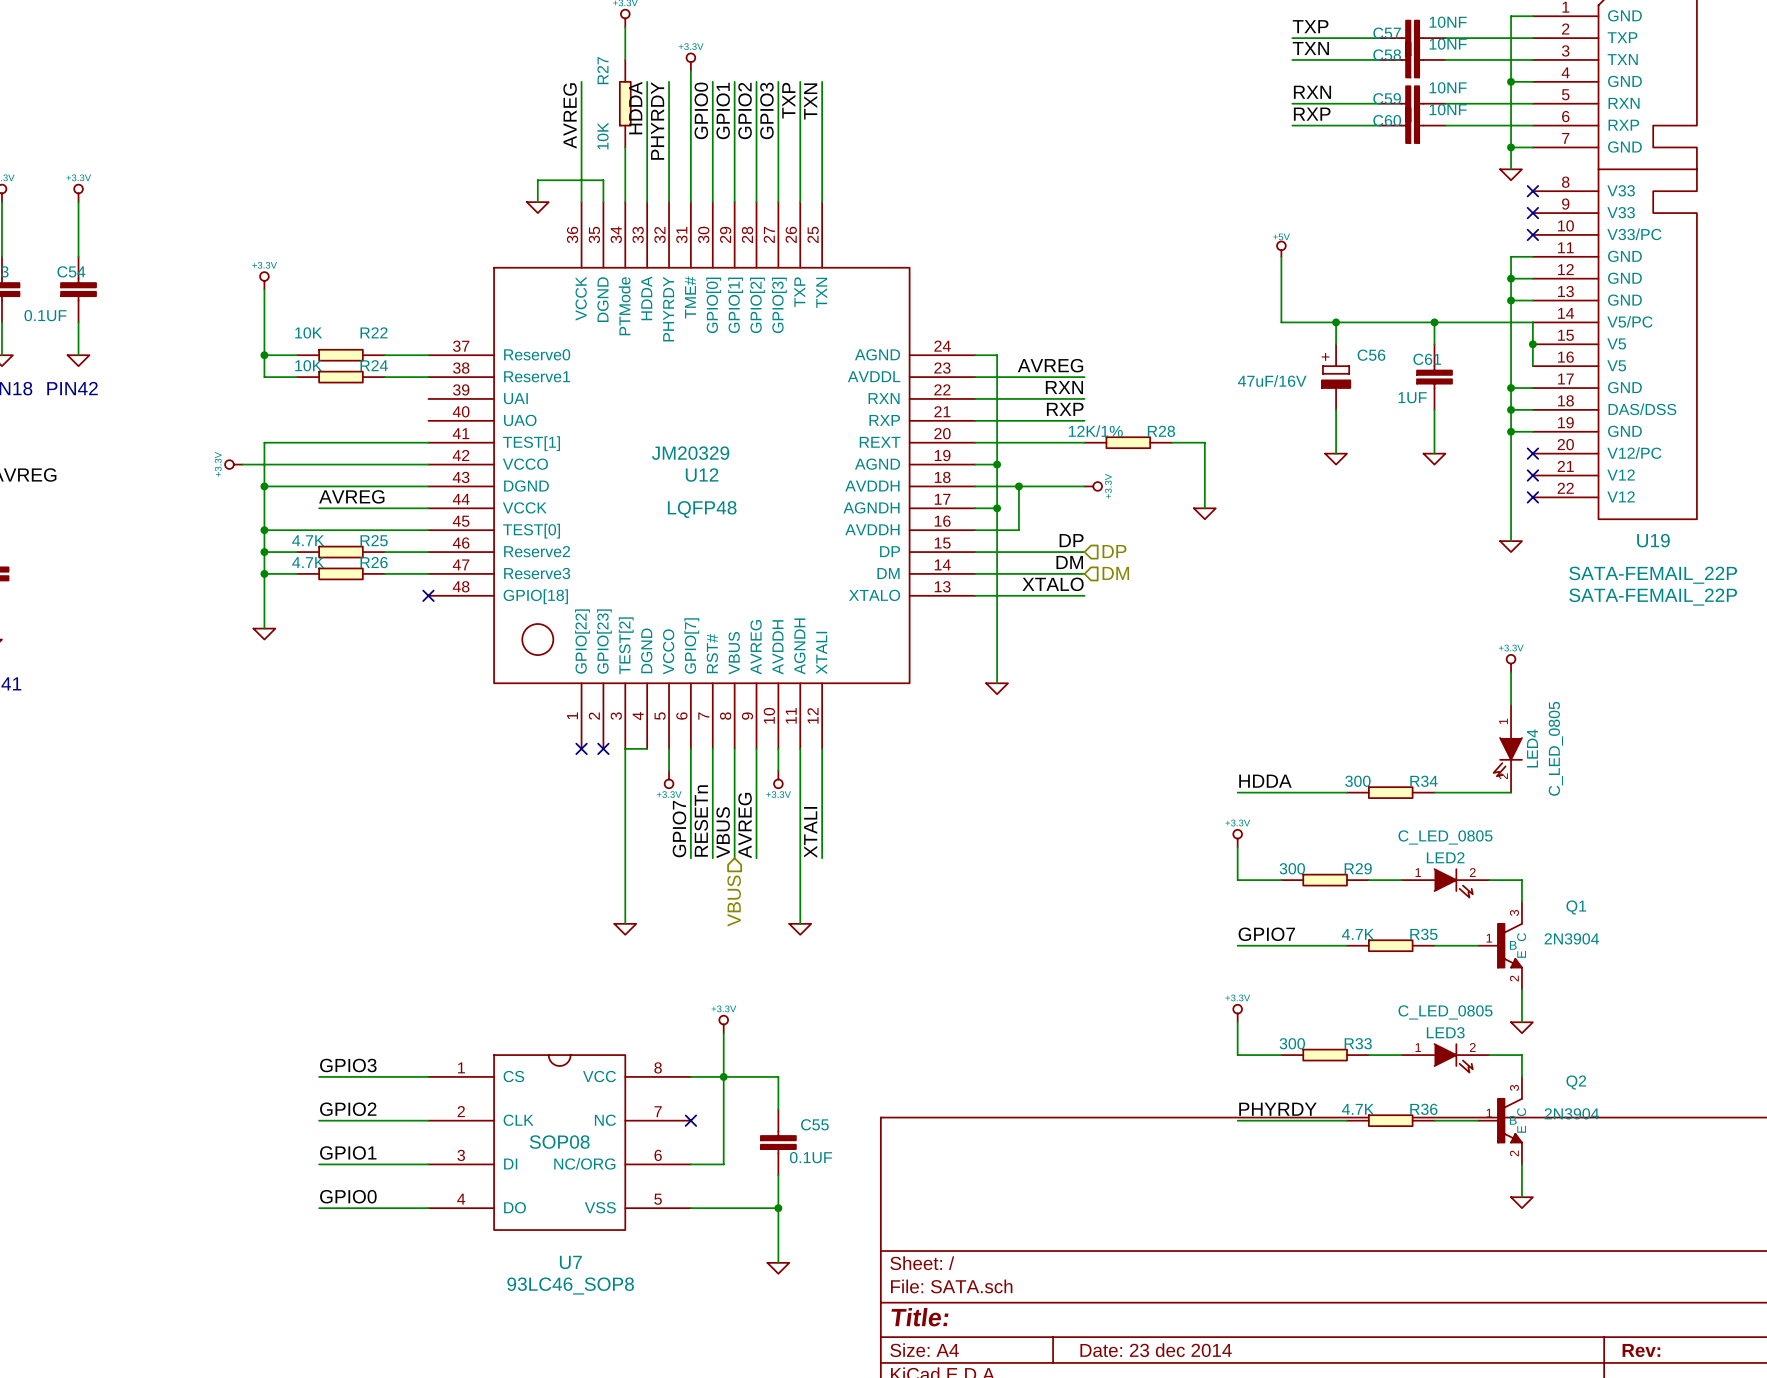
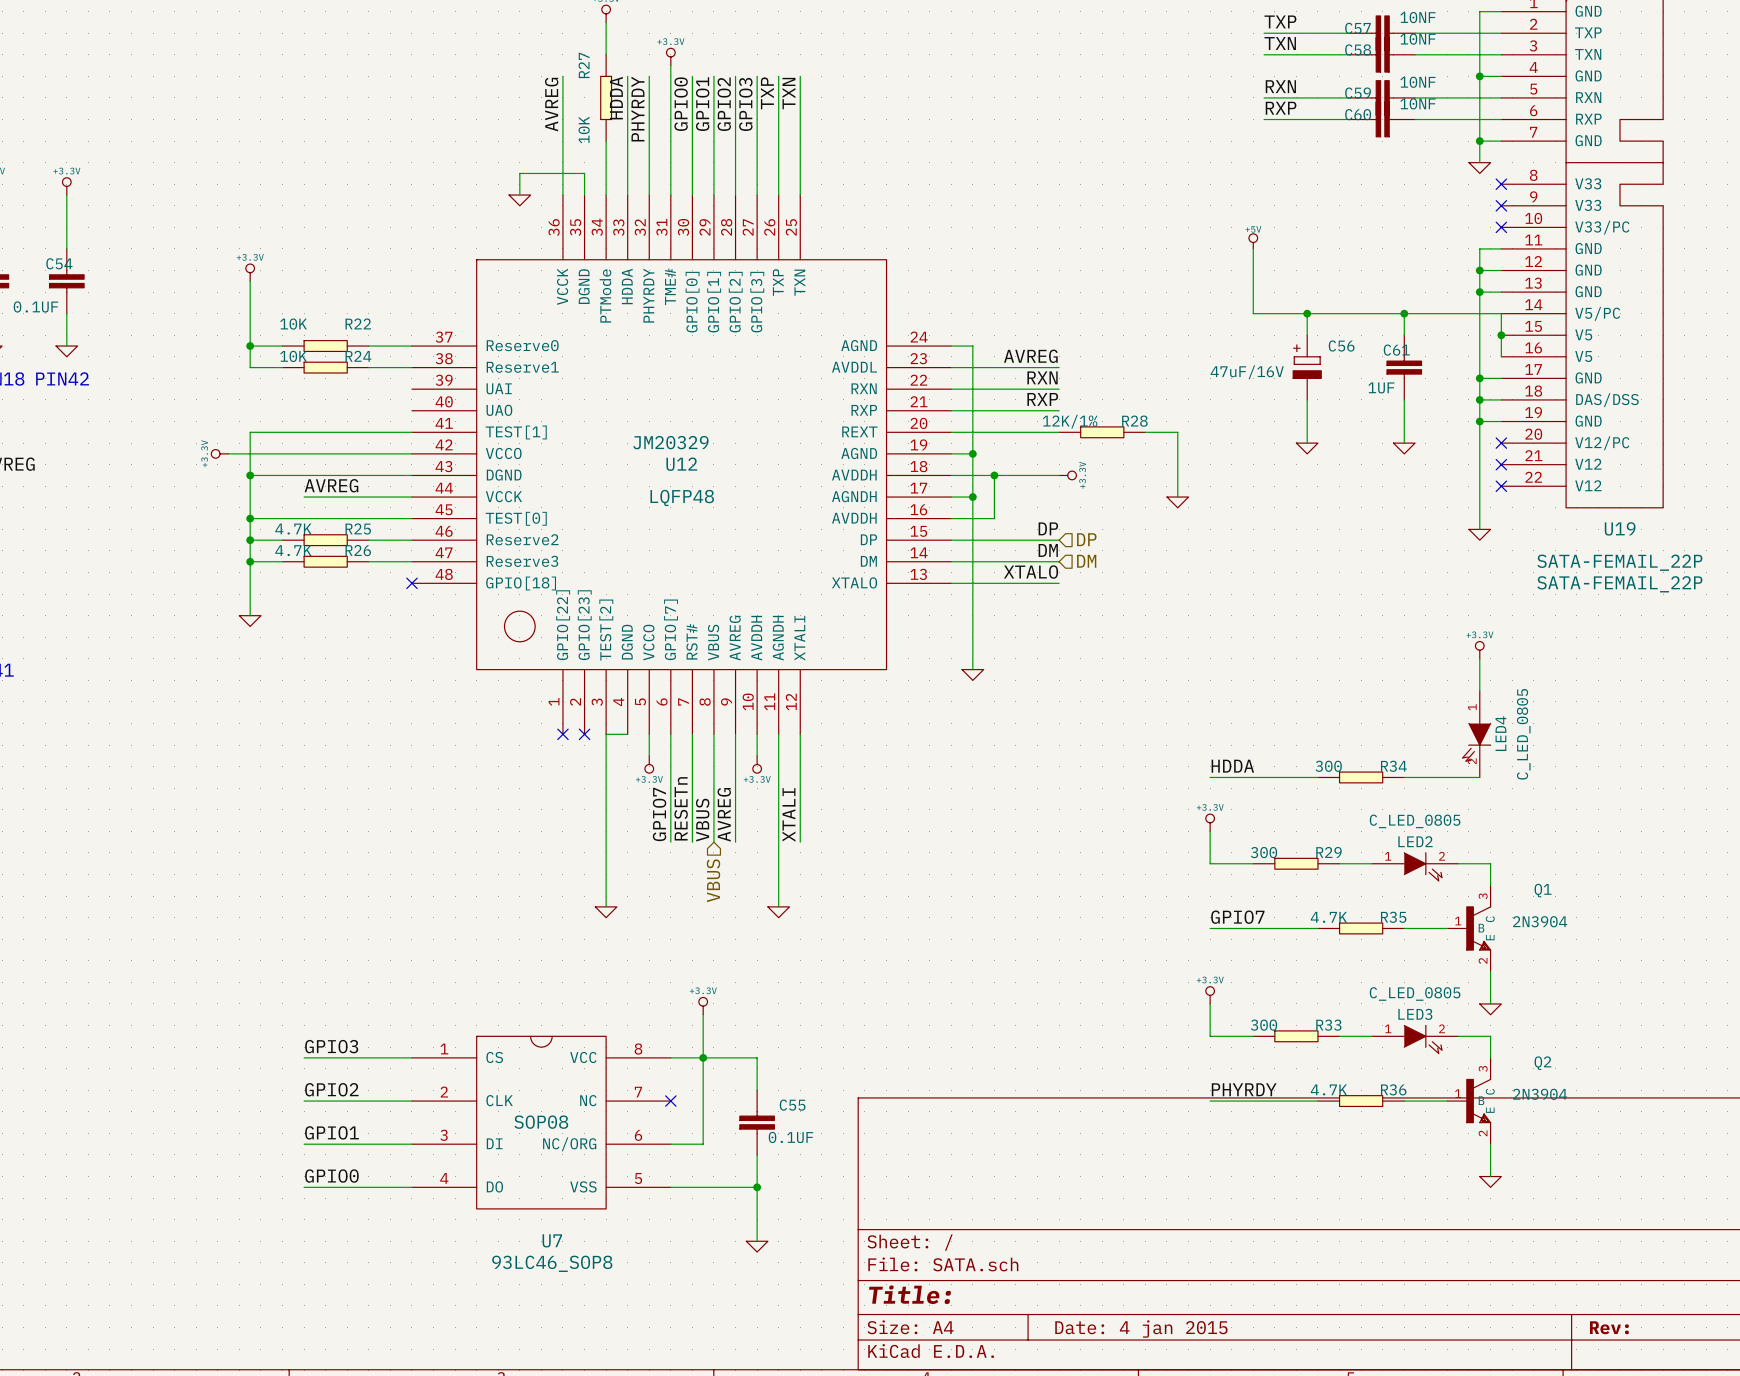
title block: Date: 23 dec 2014 (1156, 1350) -> Date: 4 jan 2015 (1141, 1329)

